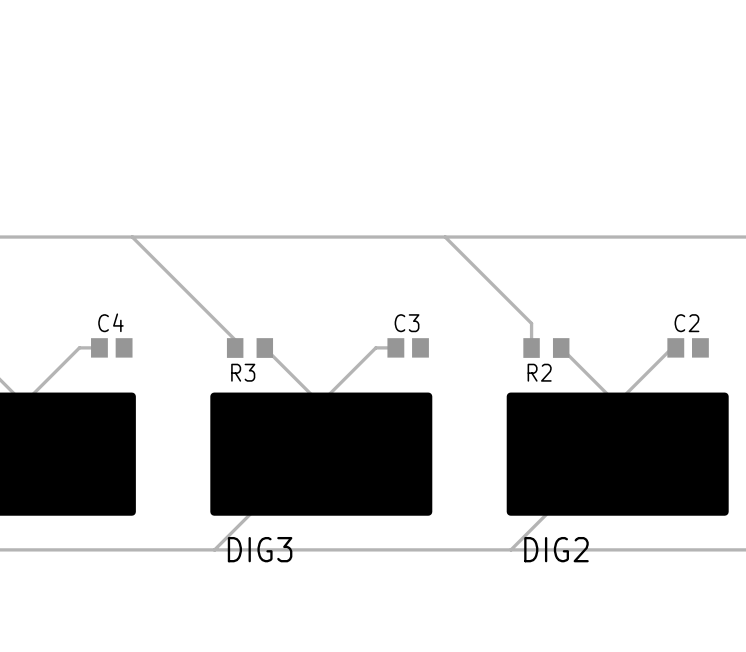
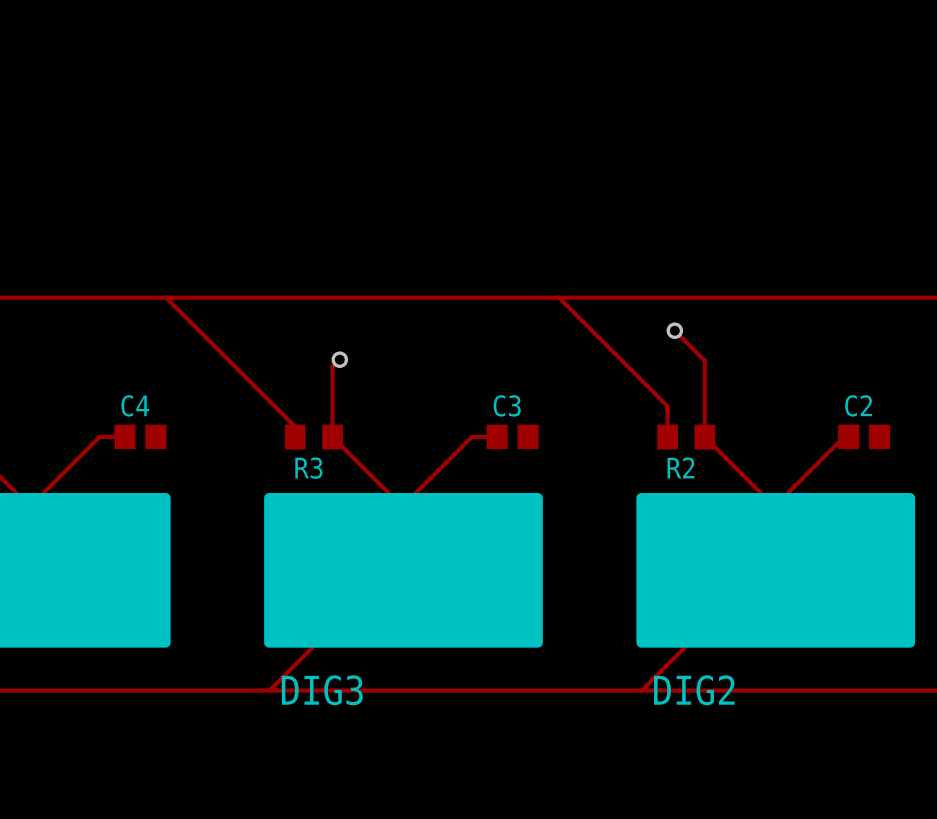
track: none -> (674, 330) (704, 360) (704, 437)
via: none -> (674, 330)
track: none -> (339, 359) (332, 366) (332, 437)
via: none -> (339, 359)

